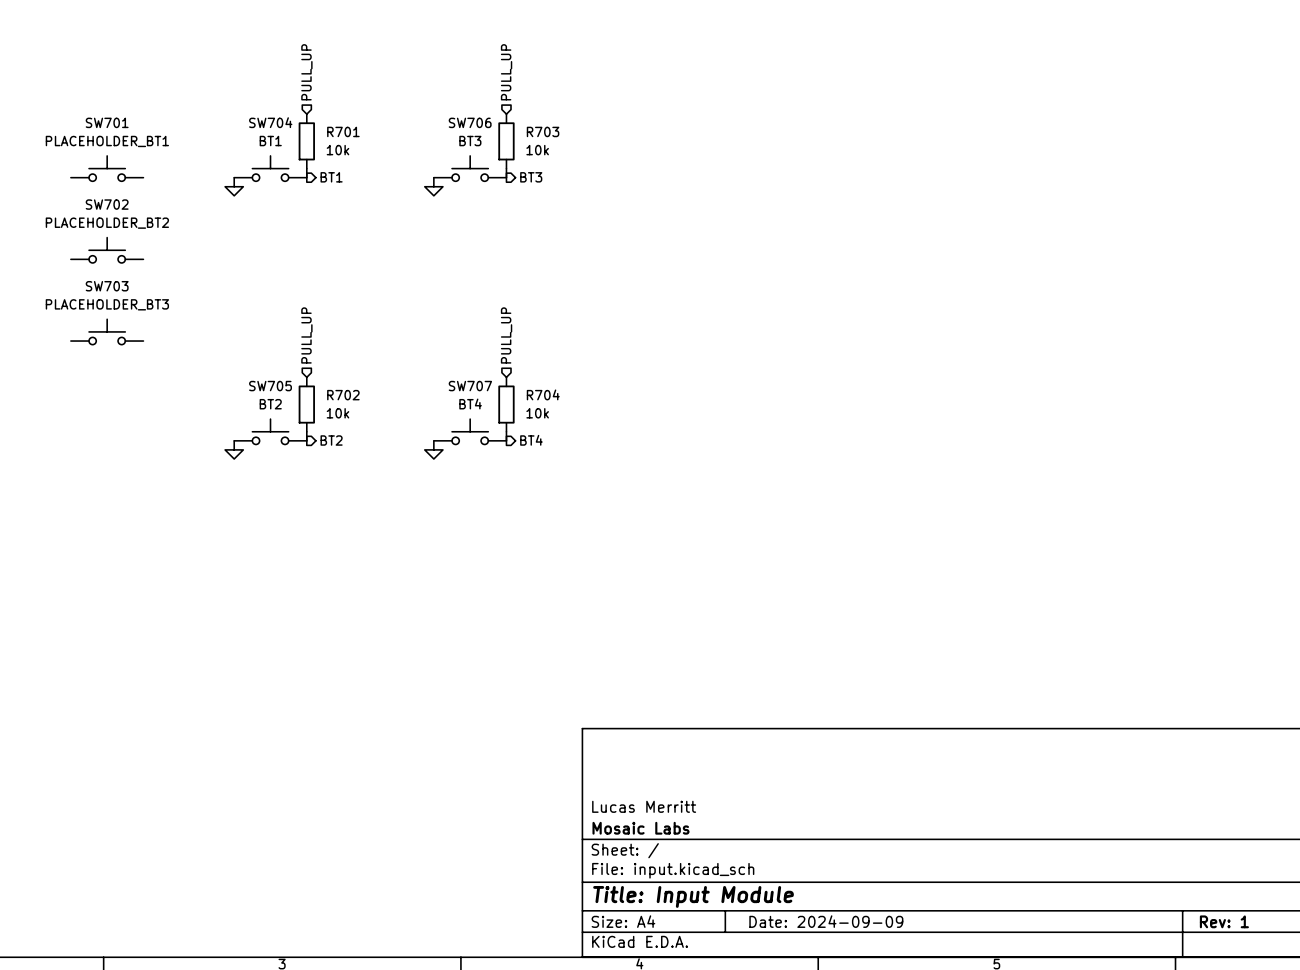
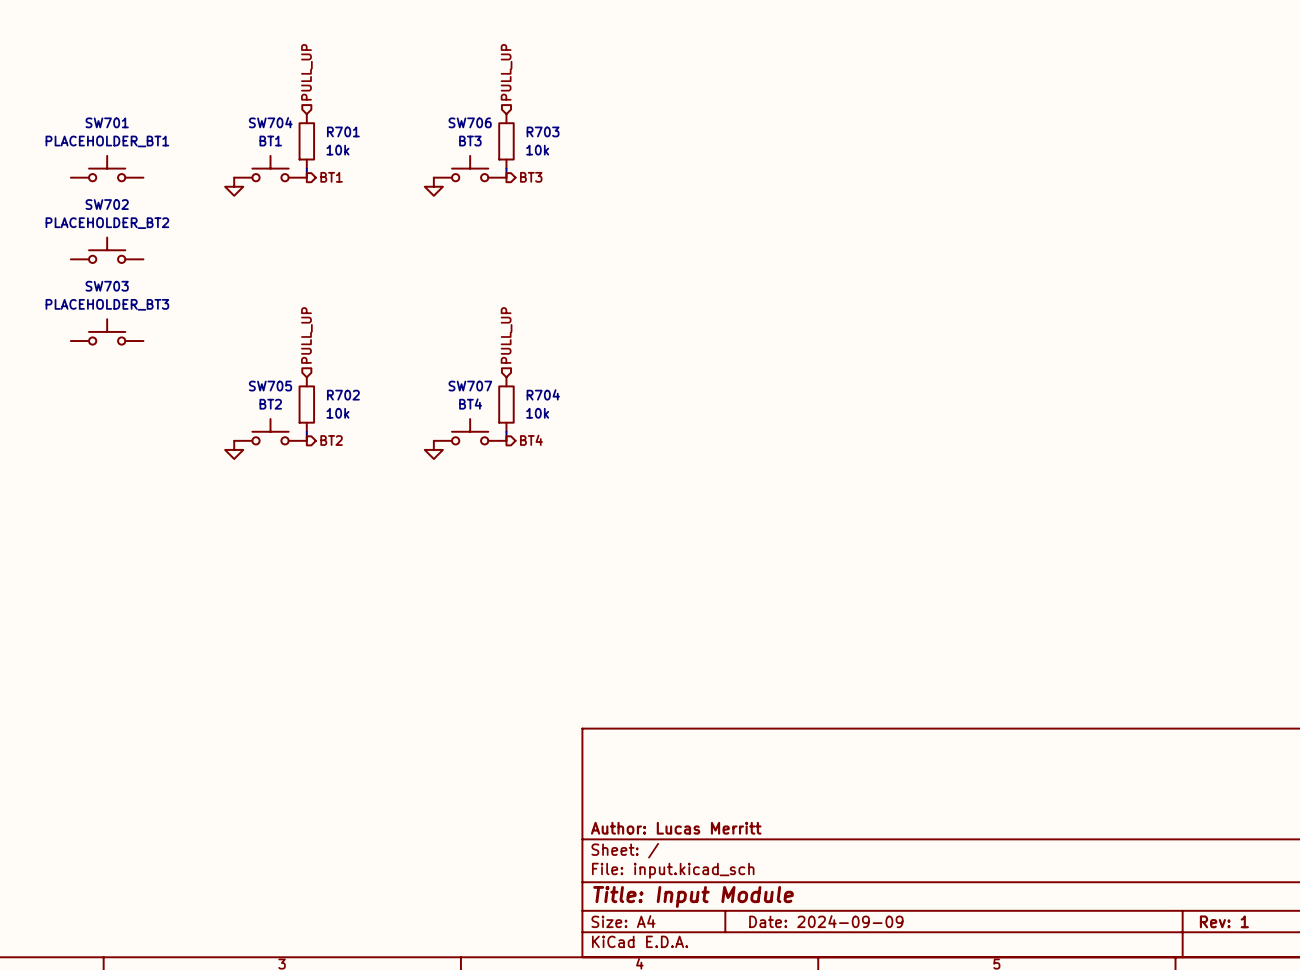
title block: Lucas Merritt (644, 806) -> none
title block: Mosaic Labs (640, 828) -> Author: Lucas Merritt (676, 828)

